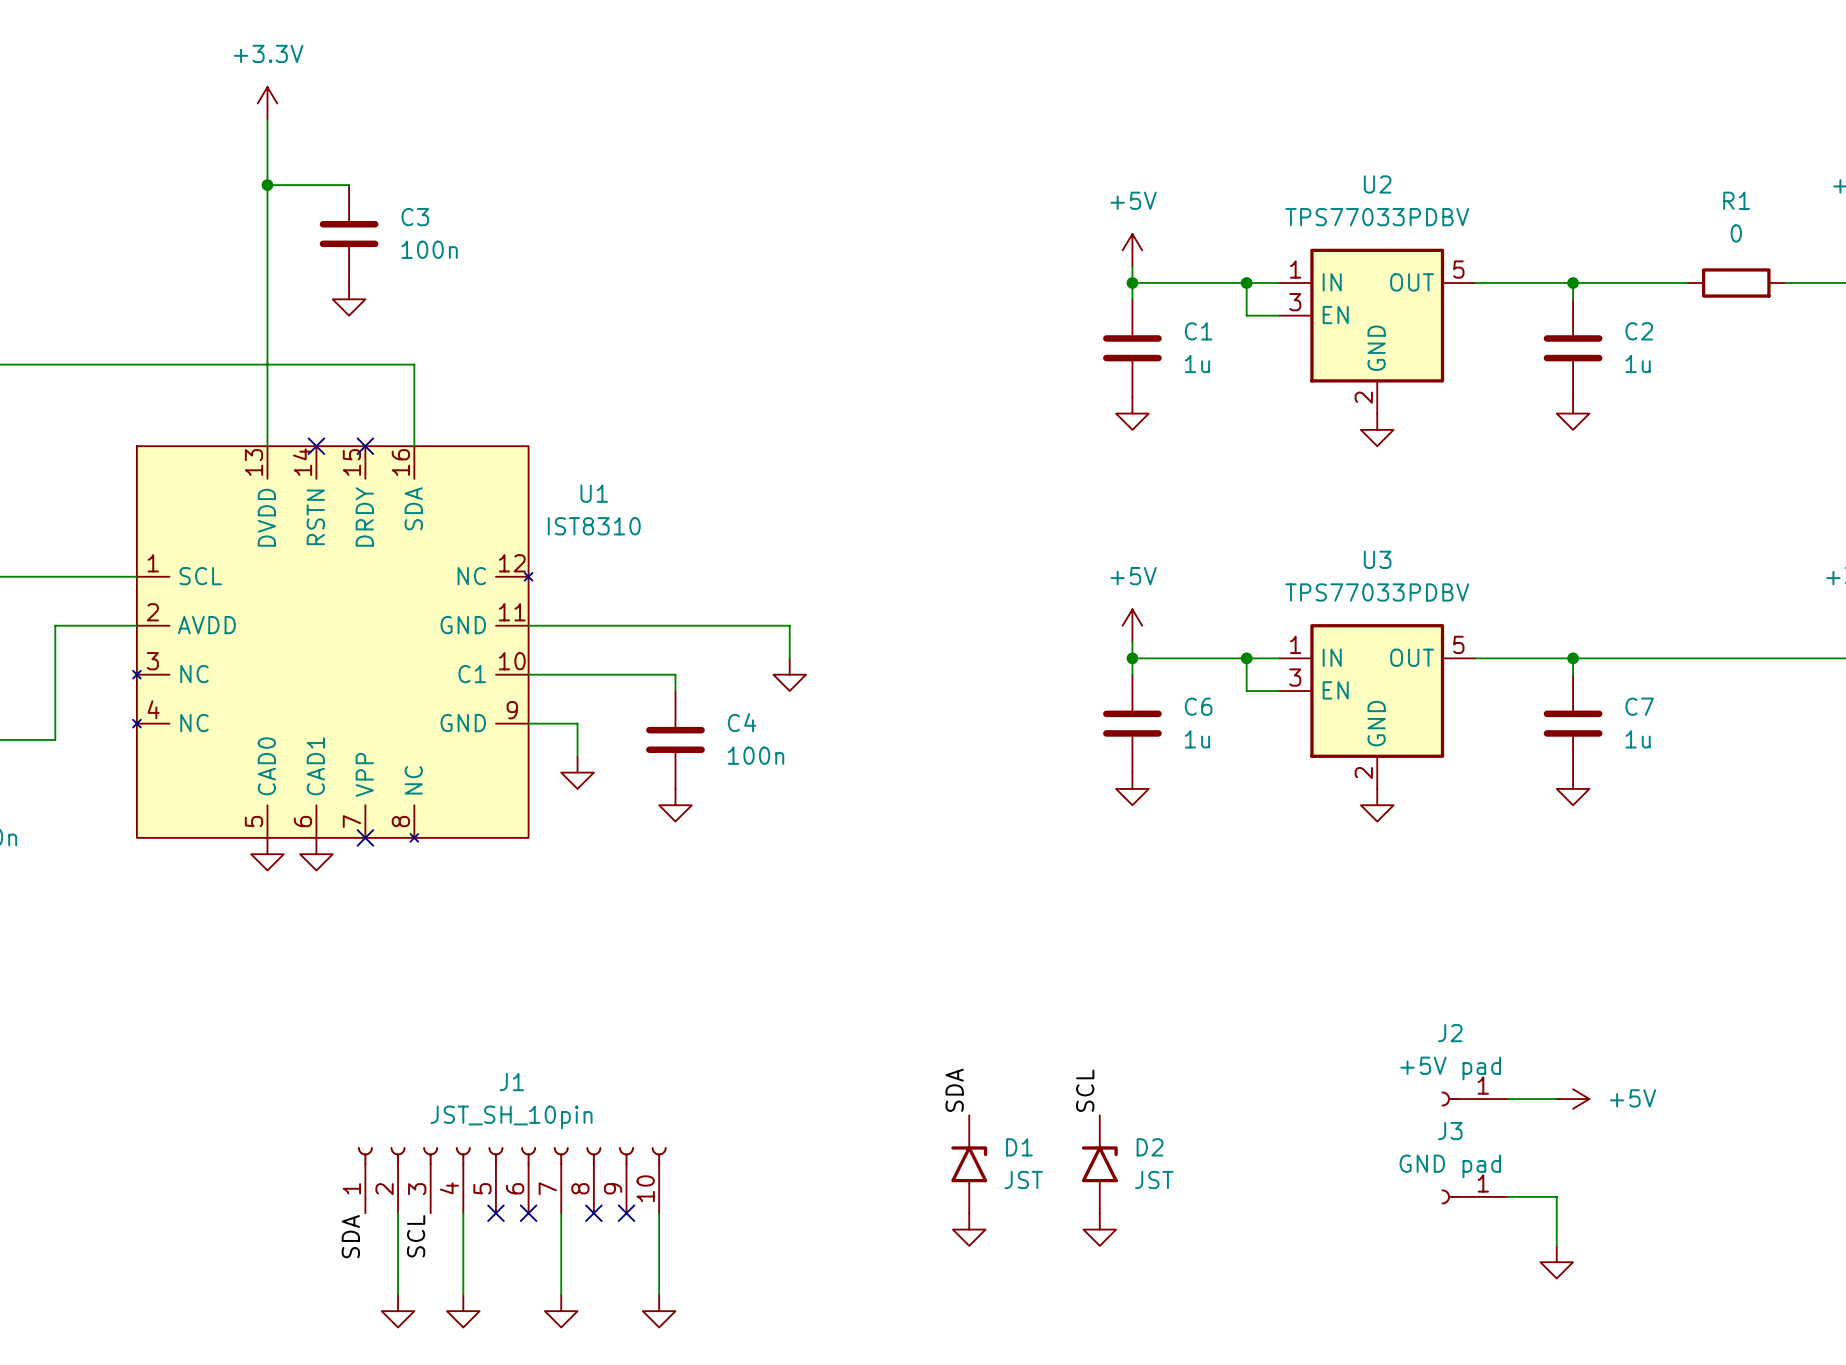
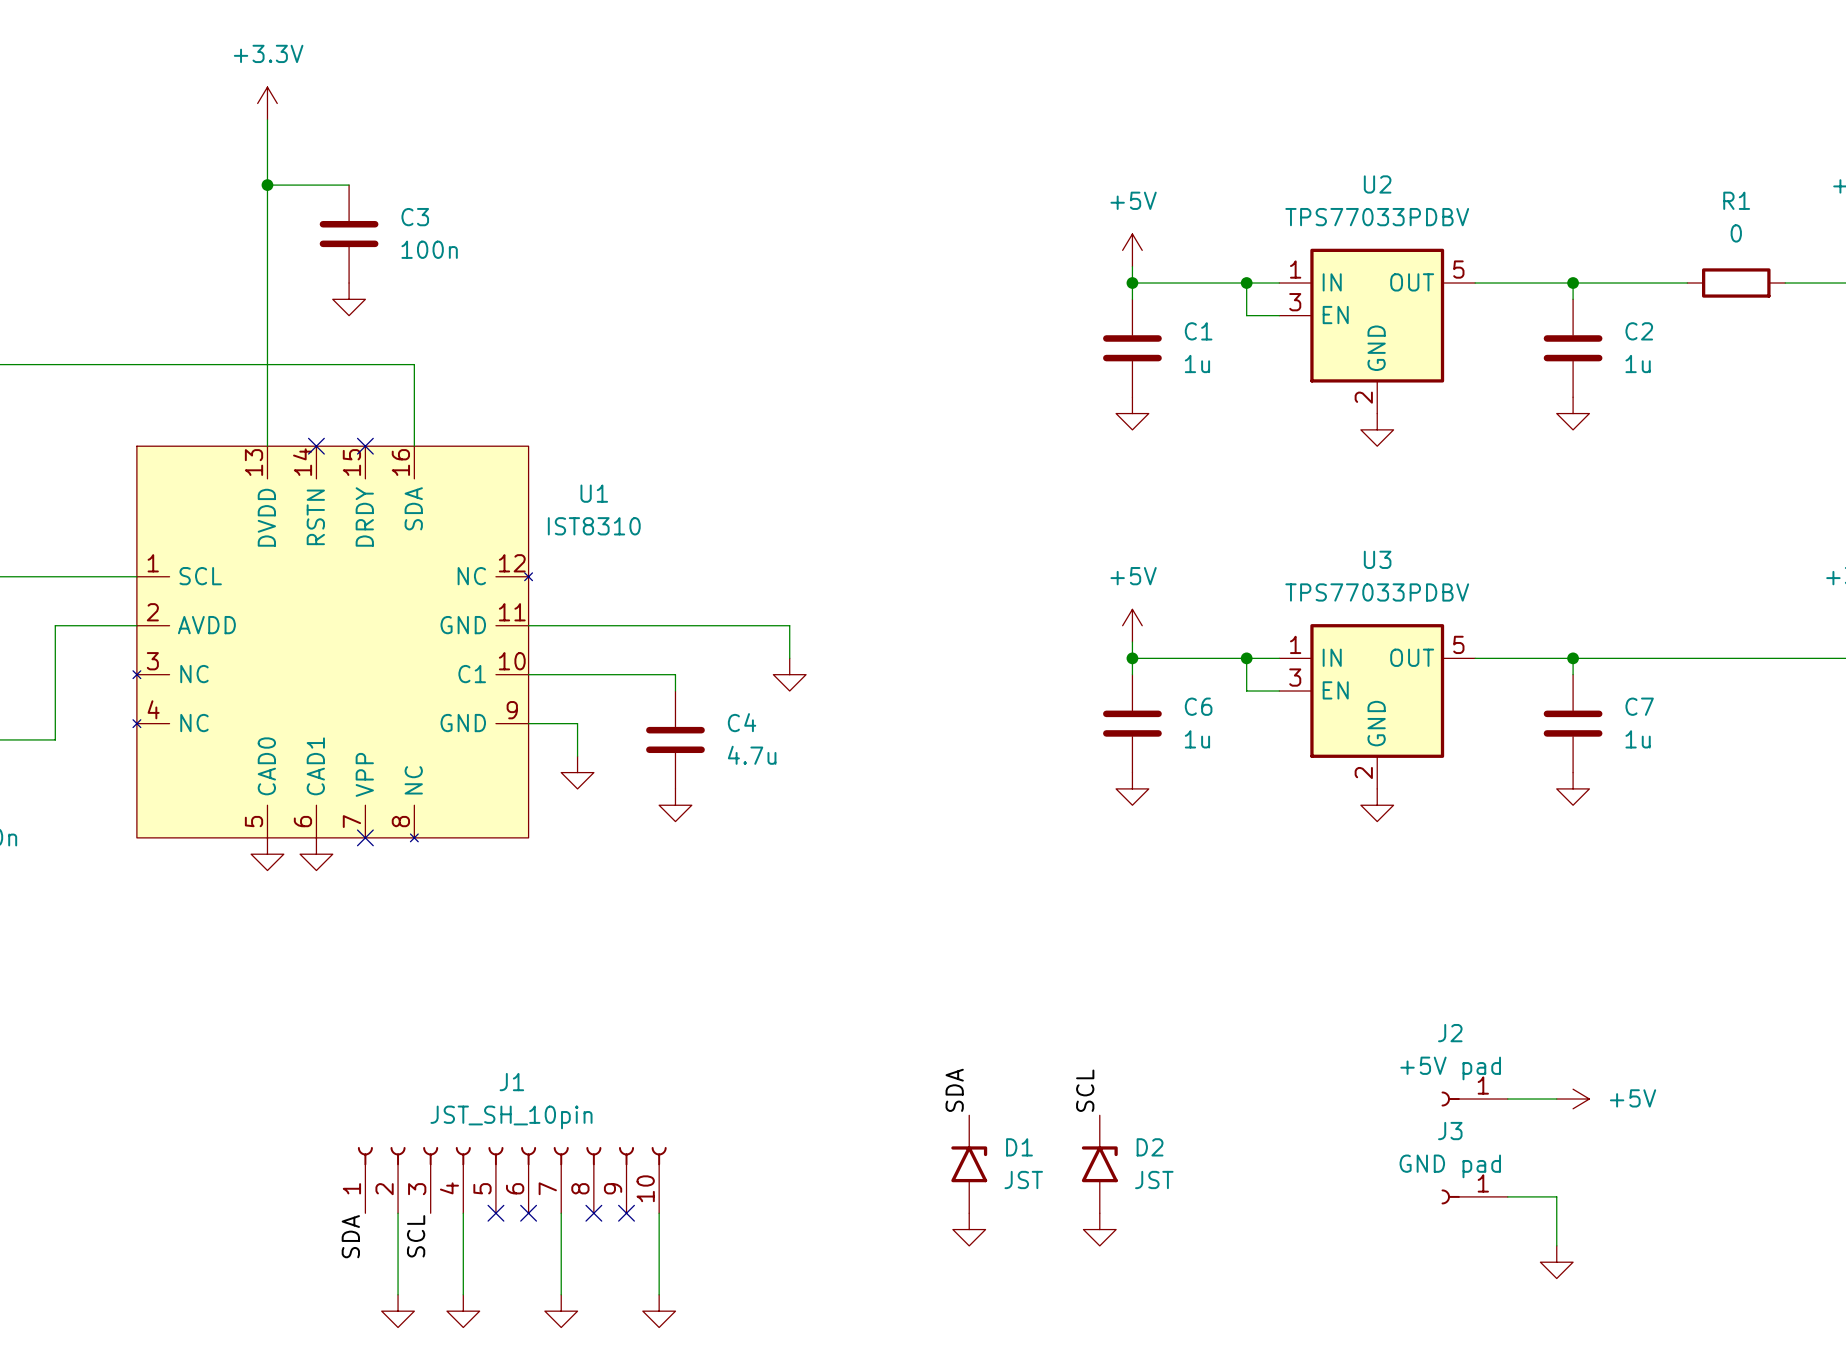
C4 value: 100n (756, 755) -> 4.7u (752, 755)

